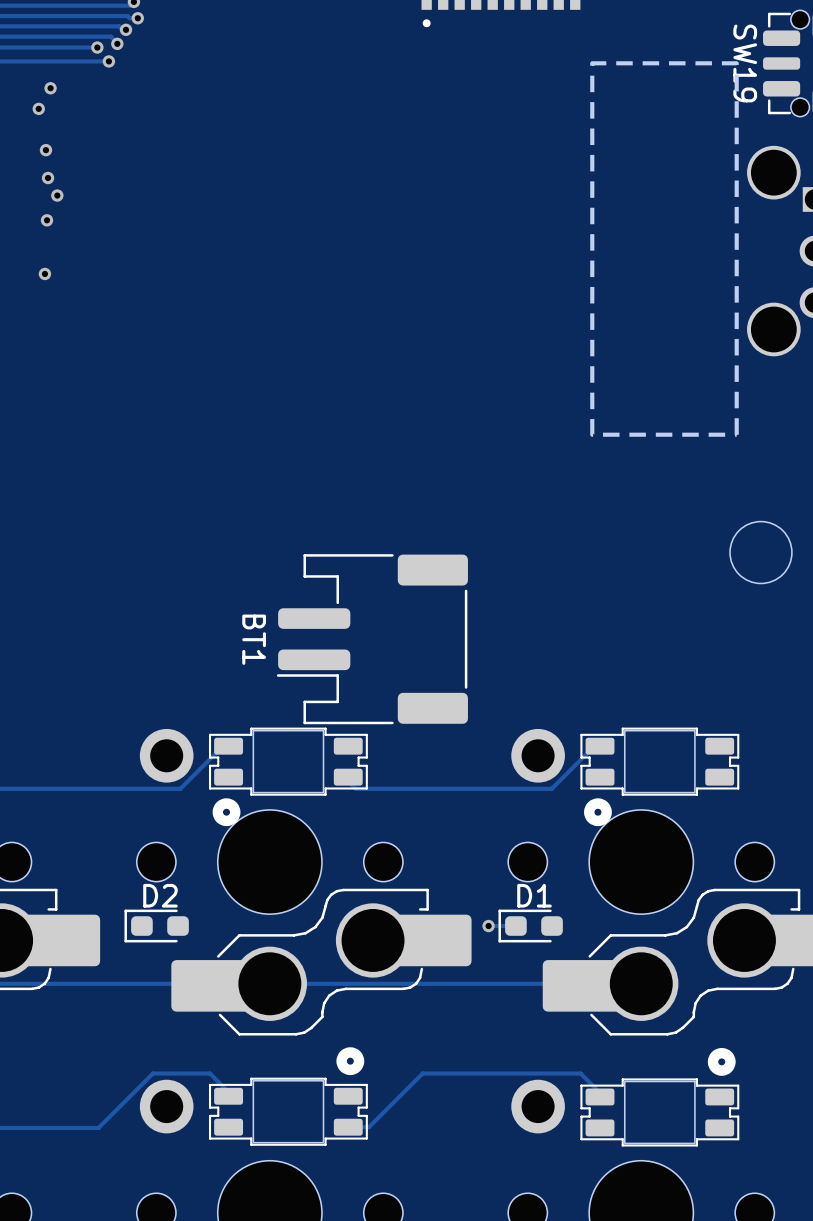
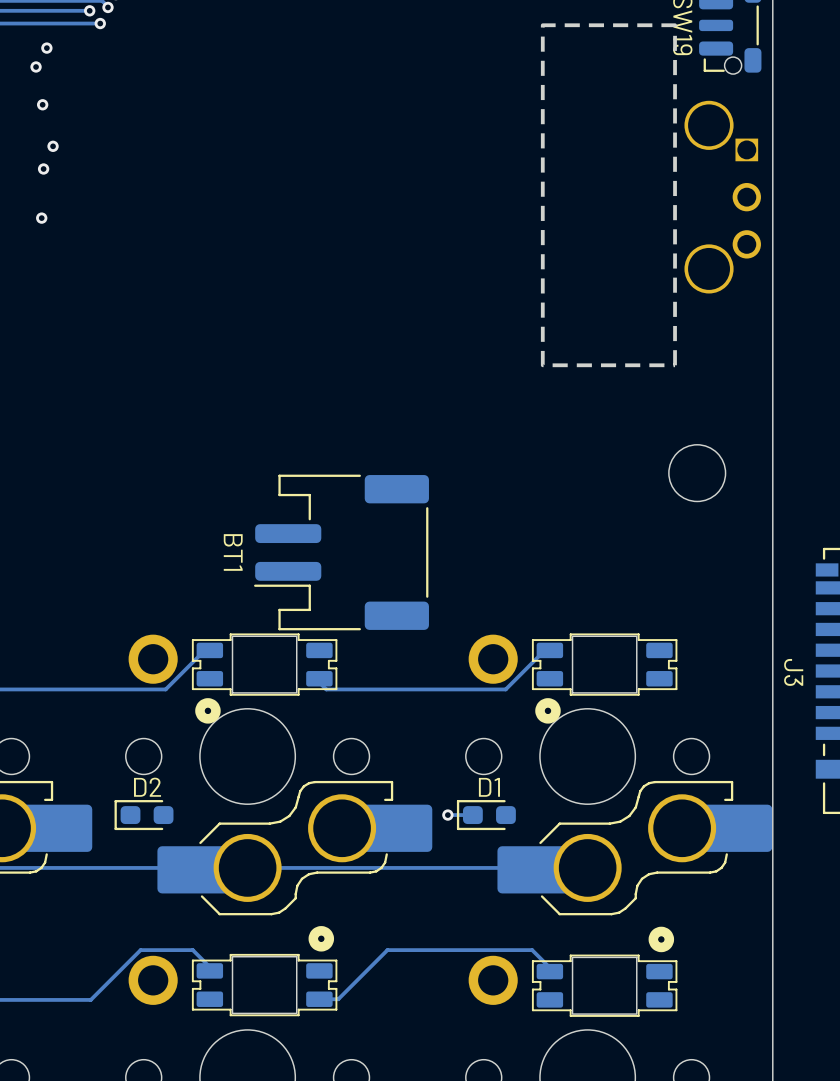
via: (48, 178) -> none

